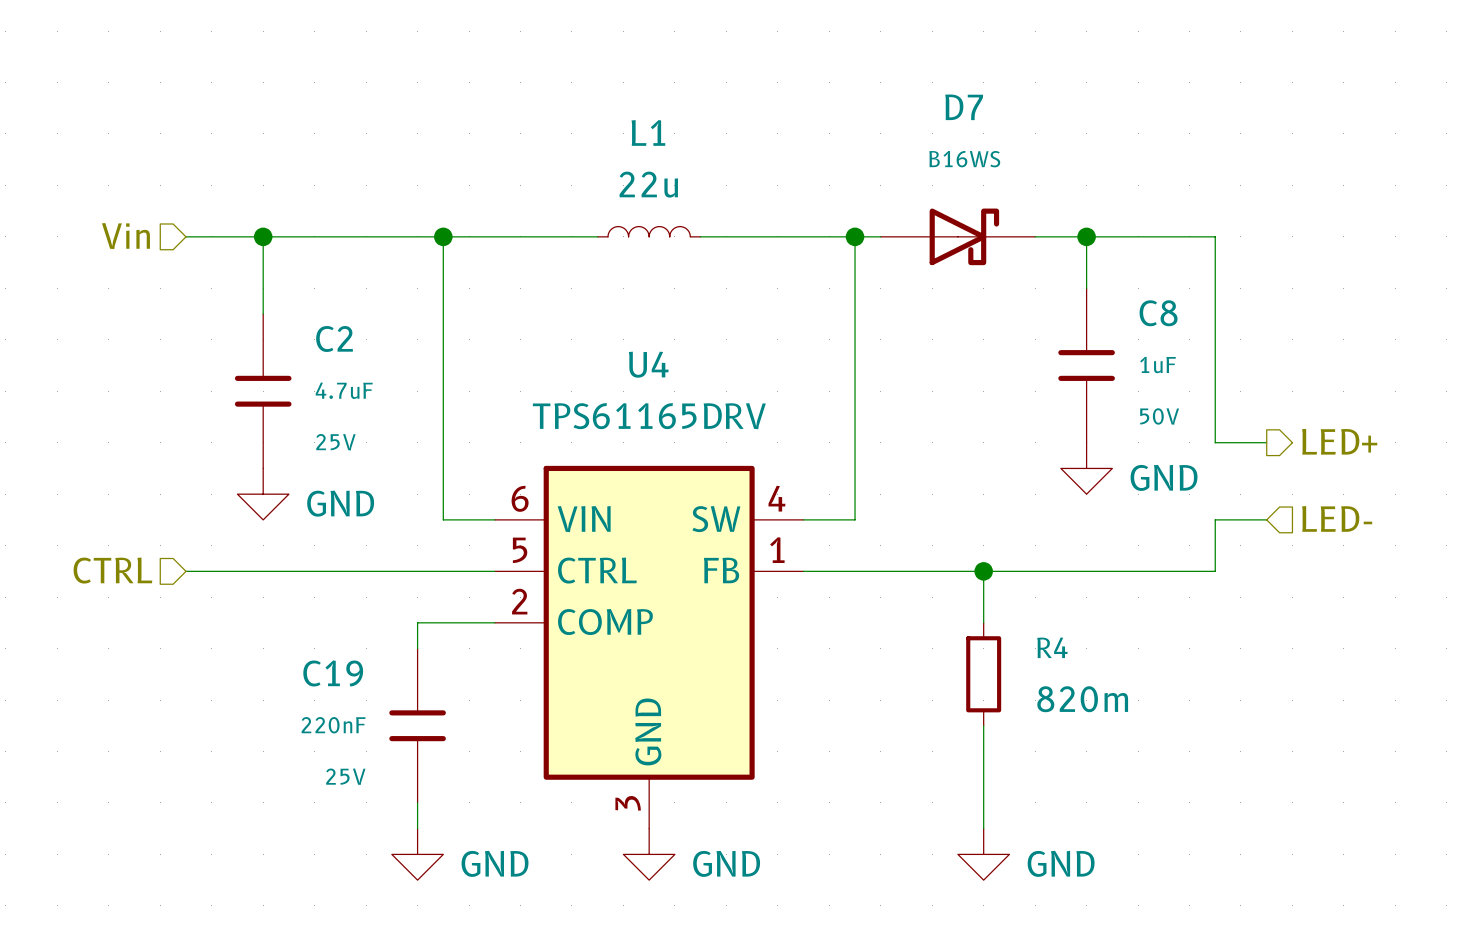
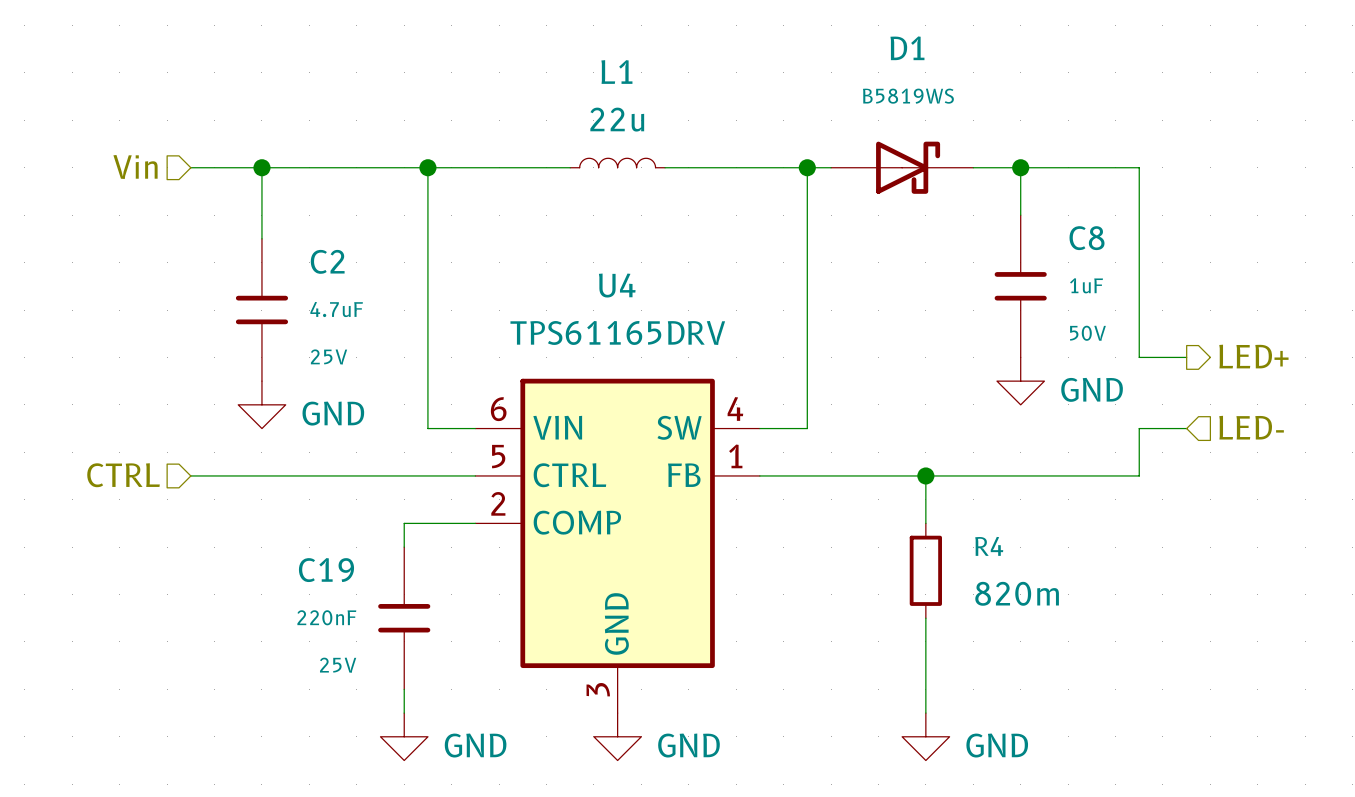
D7 name: D7 (964, 107) -> D1 (907, 48)
D7 value: B16WS (964, 159) -> B5819WS (908, 96)

